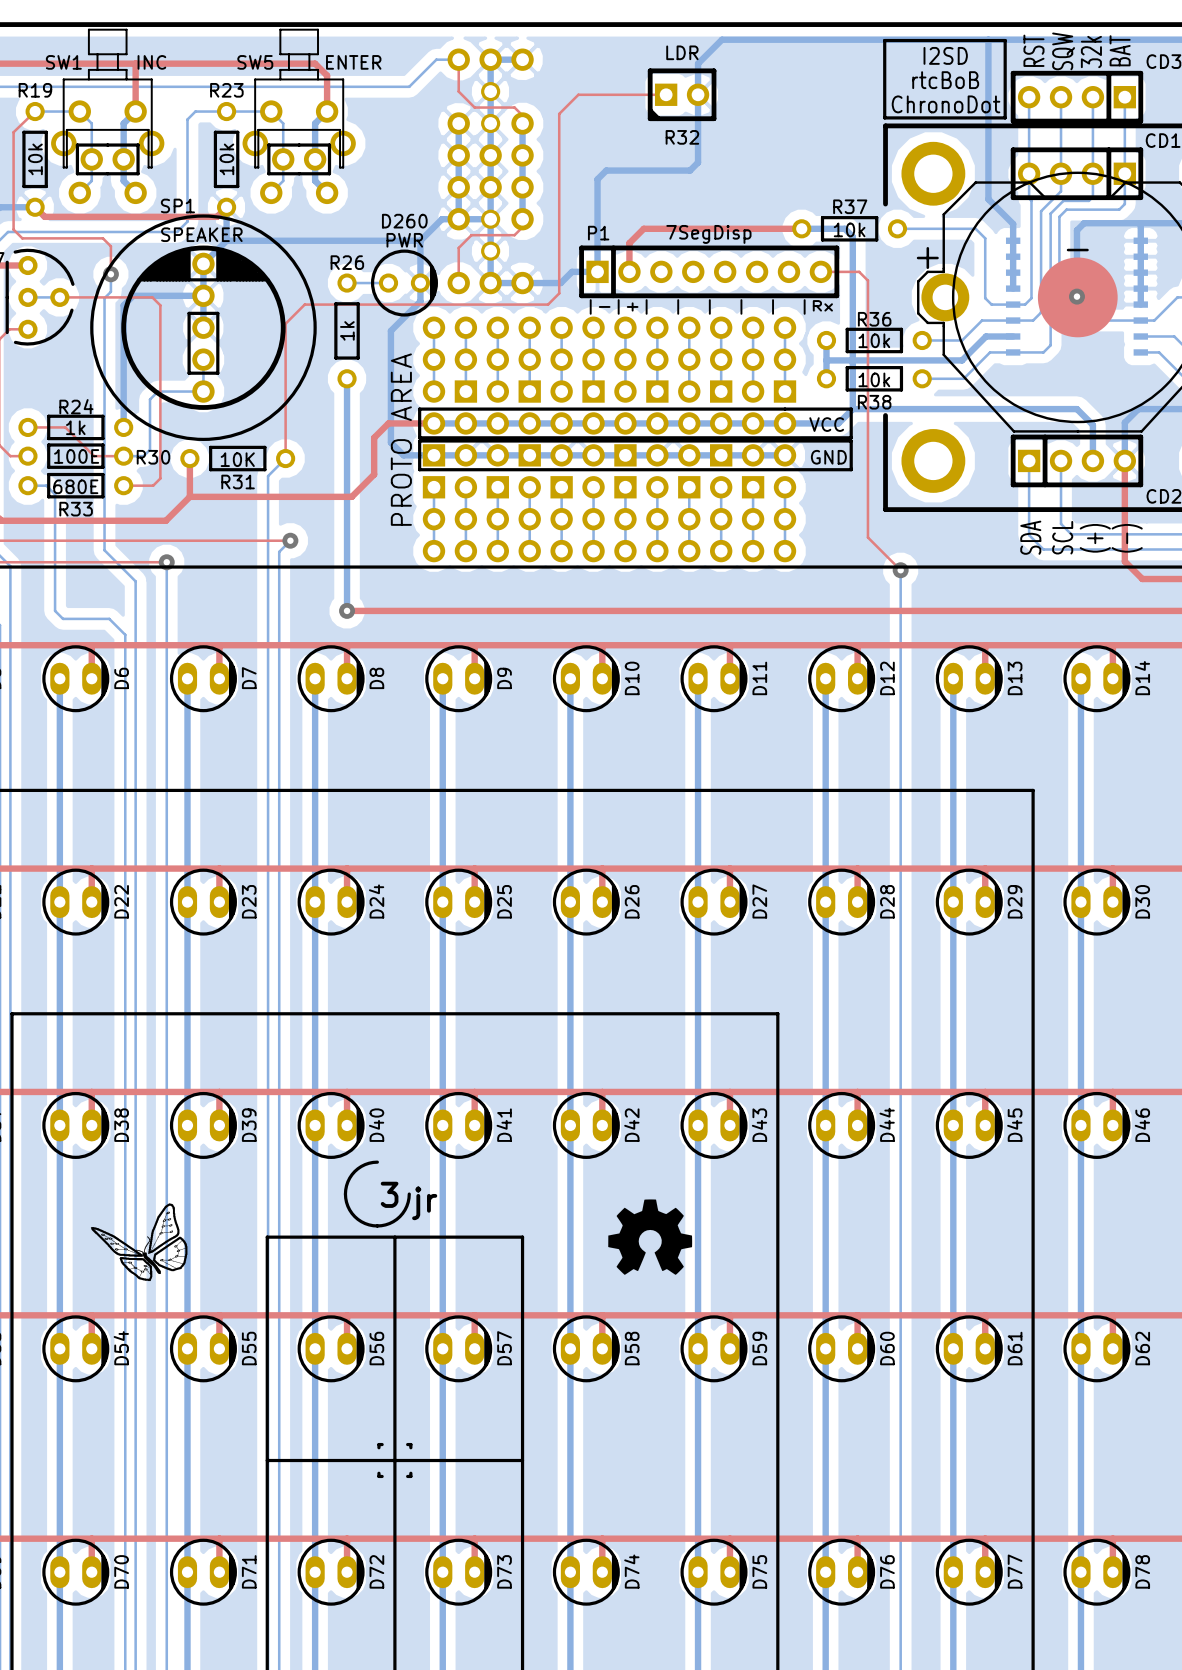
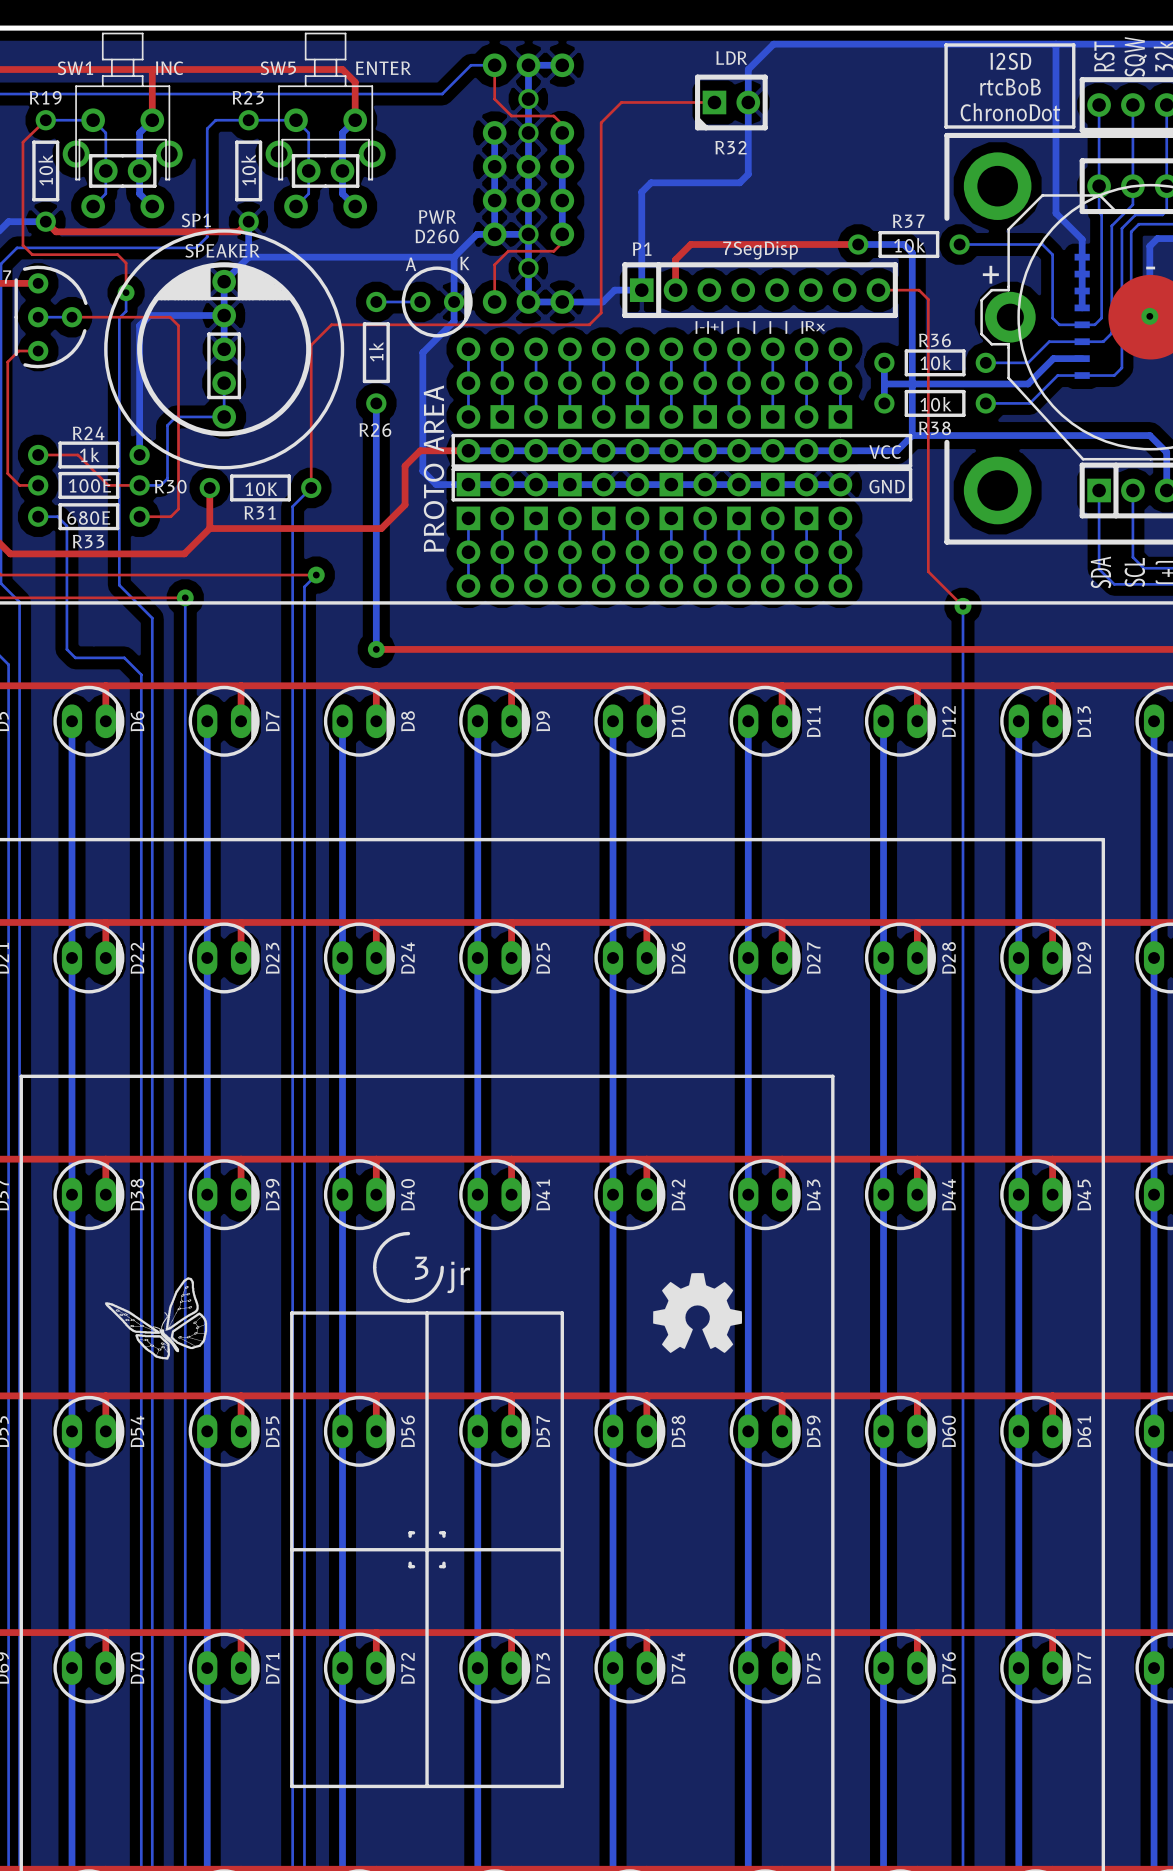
D260 value position: PWR (404, 240) -> PWR (437, 216)
text: none -> K (464, 263)
text: none -> A (410, 264)
R26 name position: R26 (347, 262) -> R26 (375, 430)

